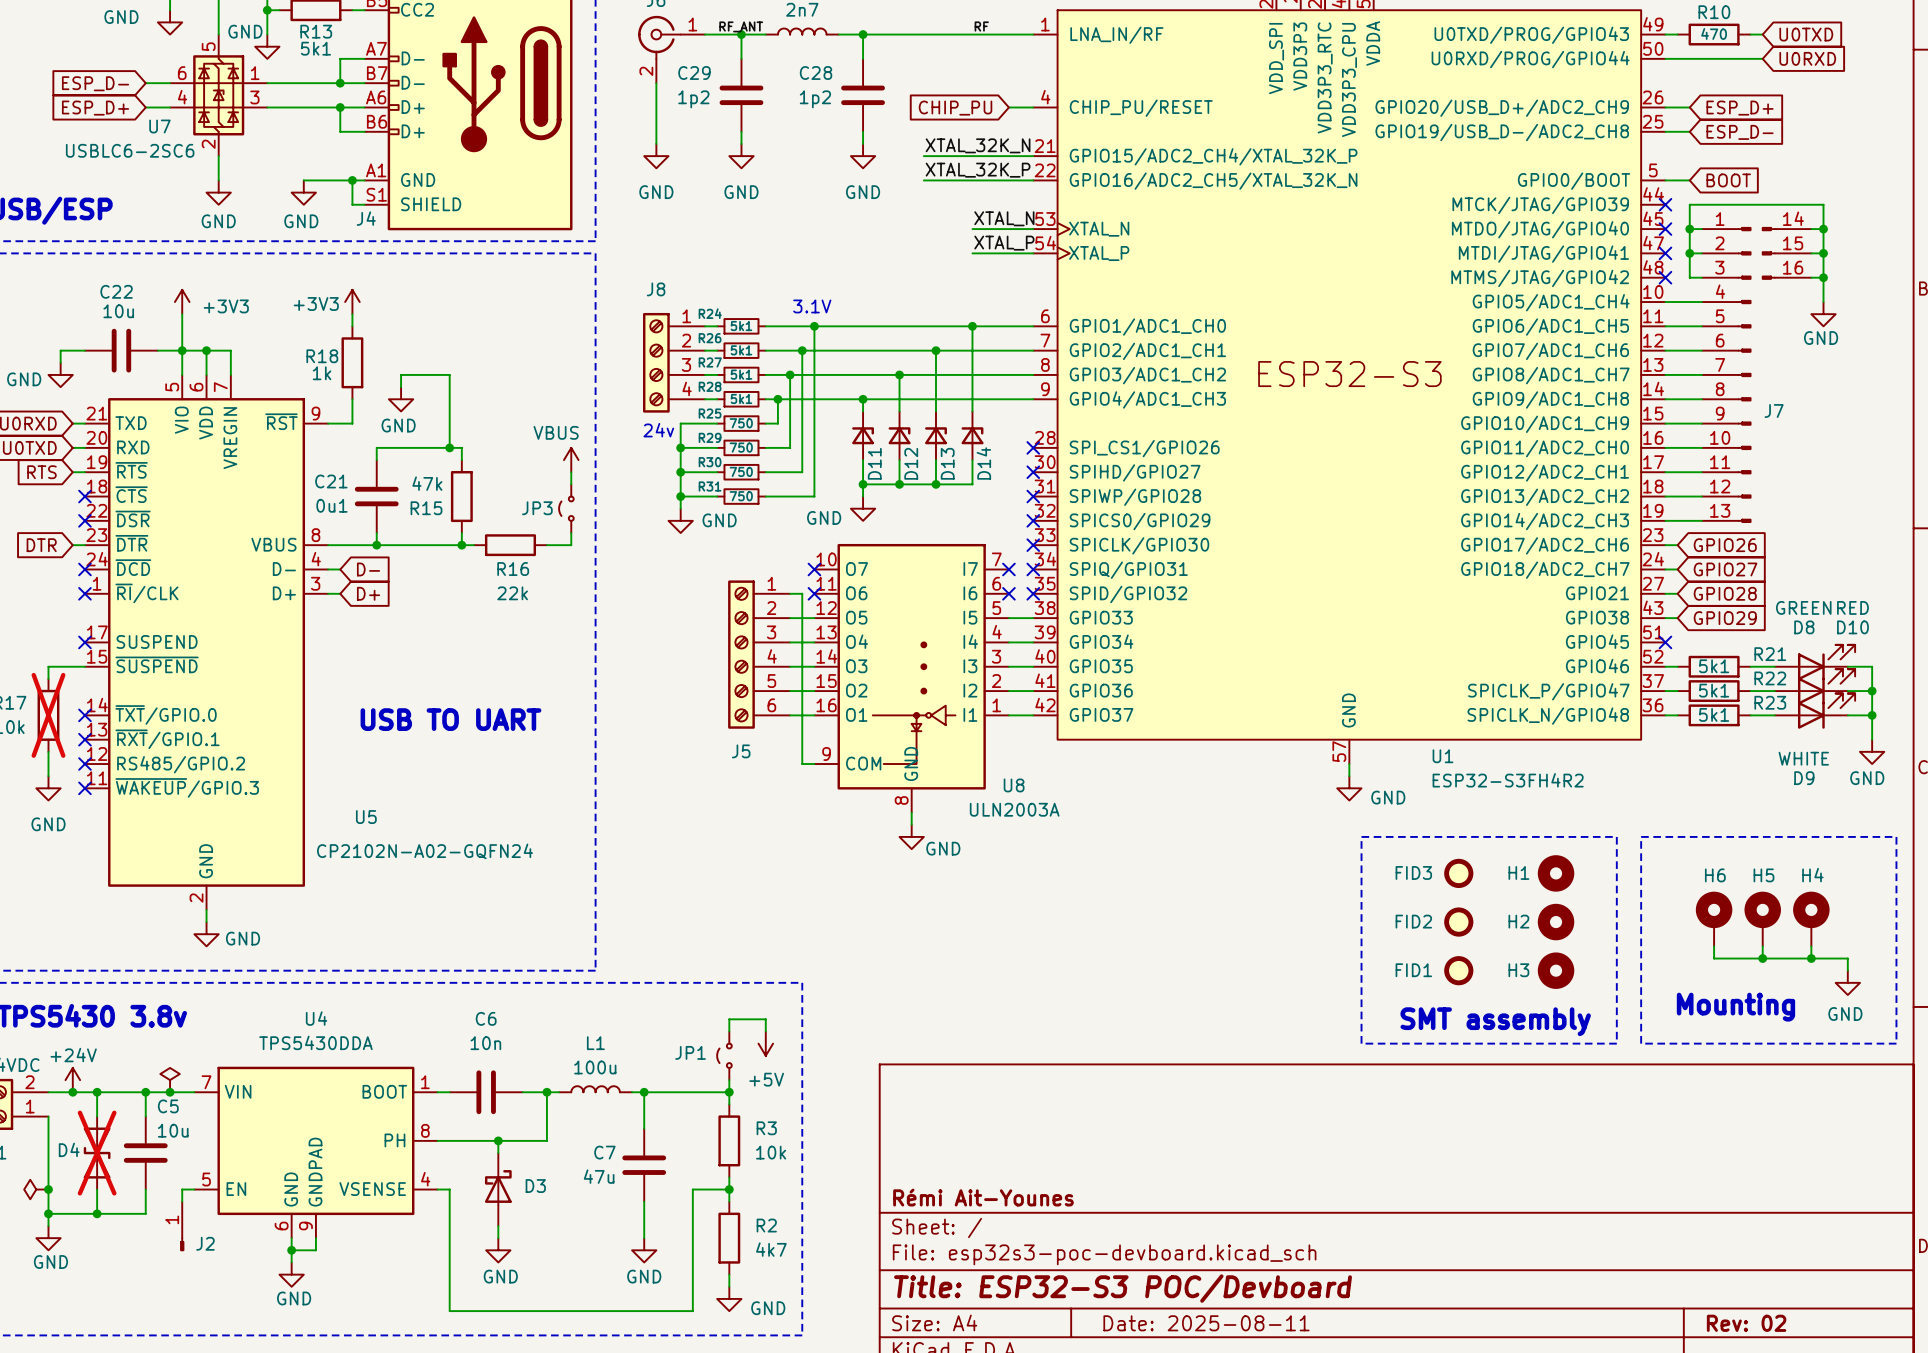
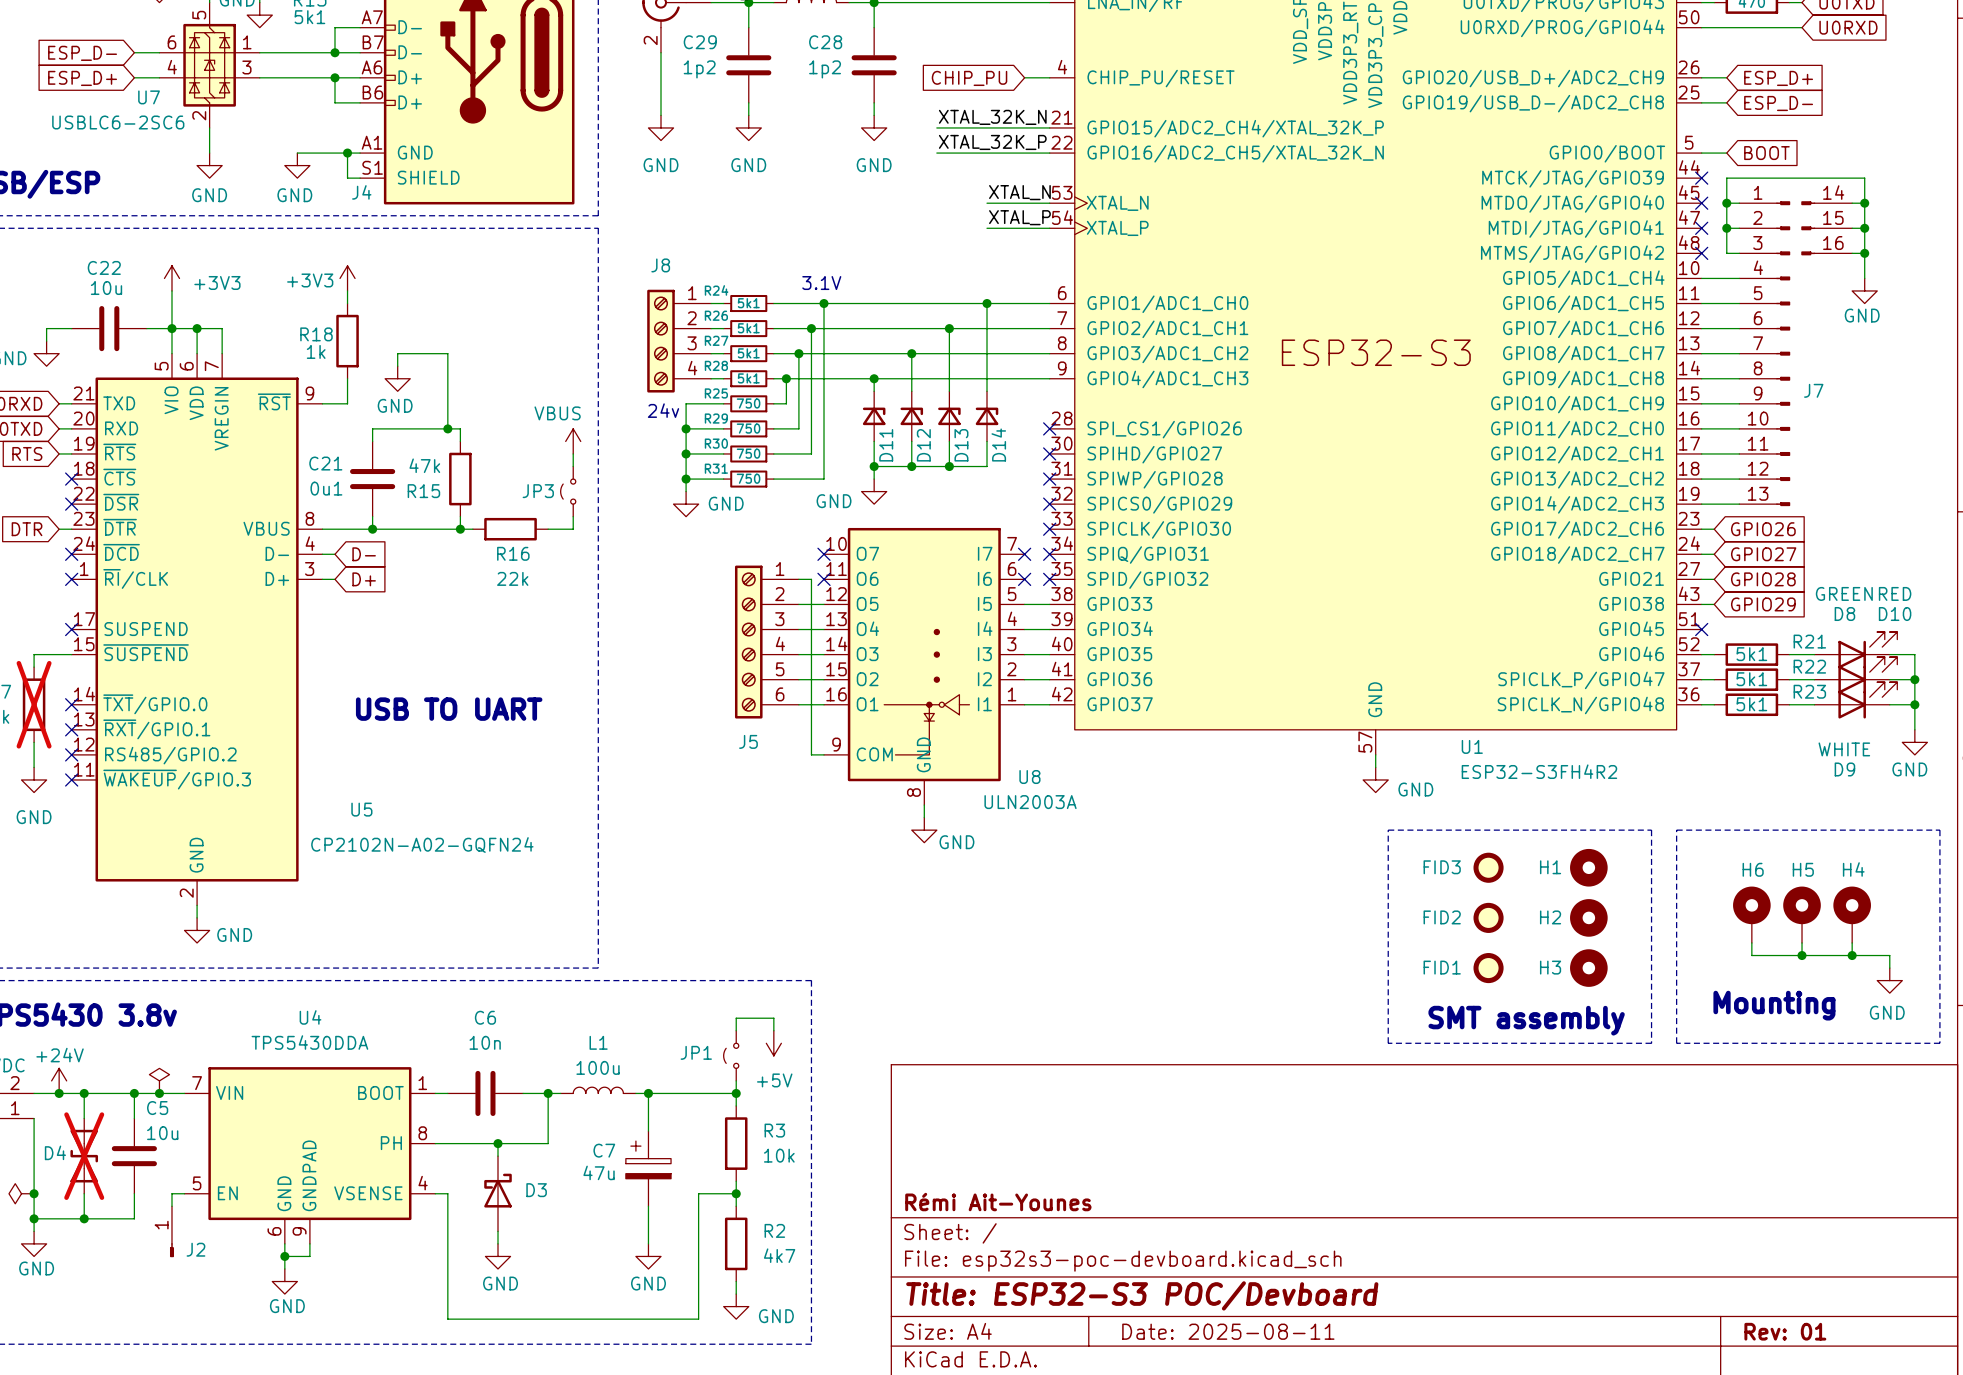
C7 symbol: [622, 1128, 667, 1202] -> [625, 1131, 672, 1207]
title block: Rev: 02 (1746, 1323) -> Rev: 01 (1785, 1331)

